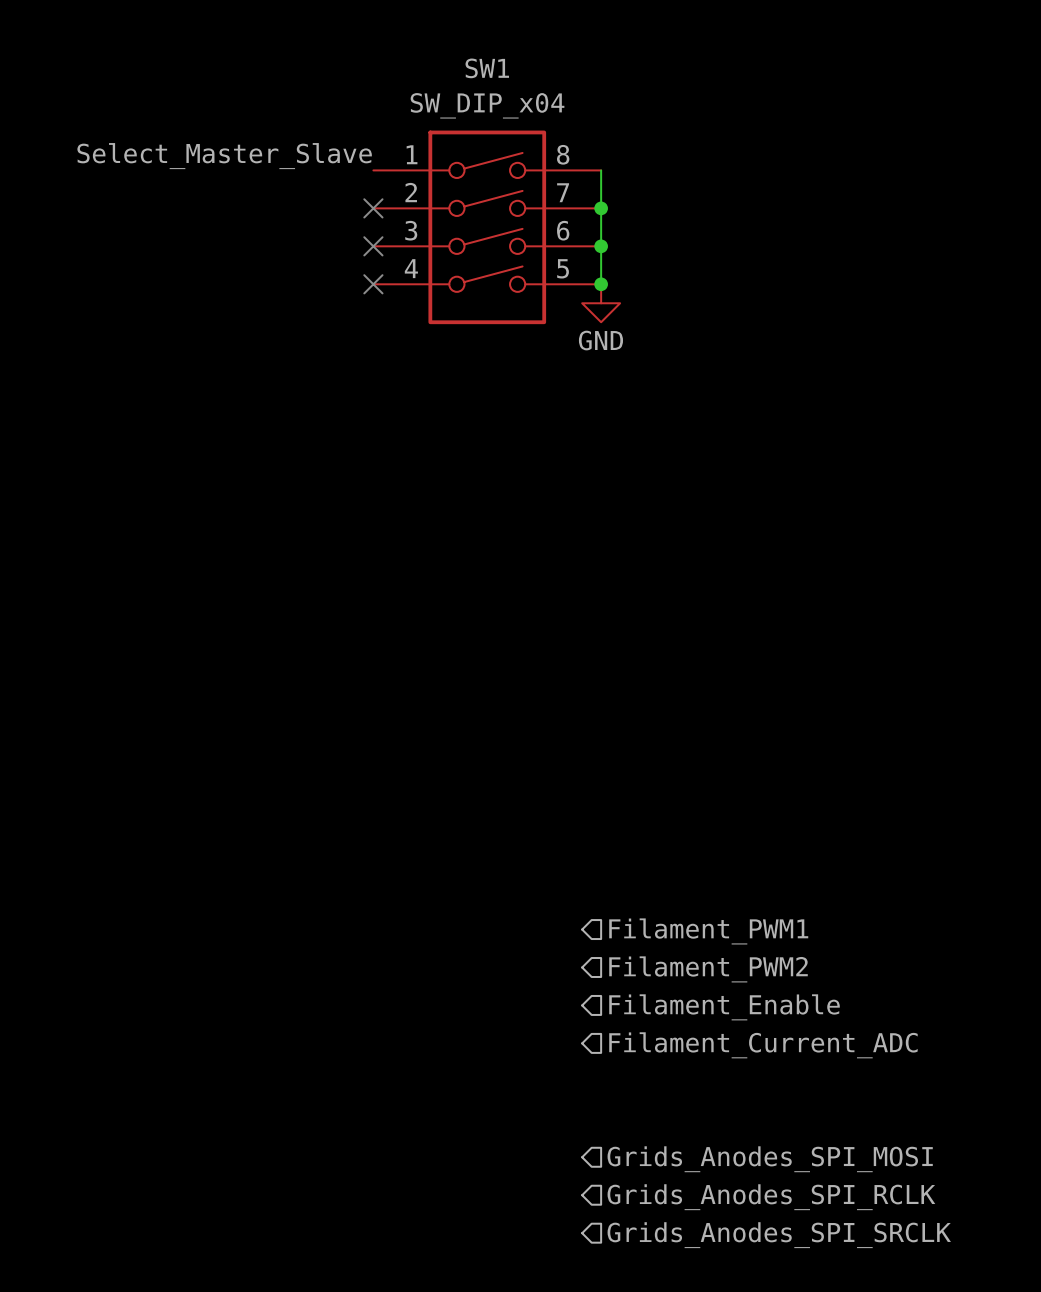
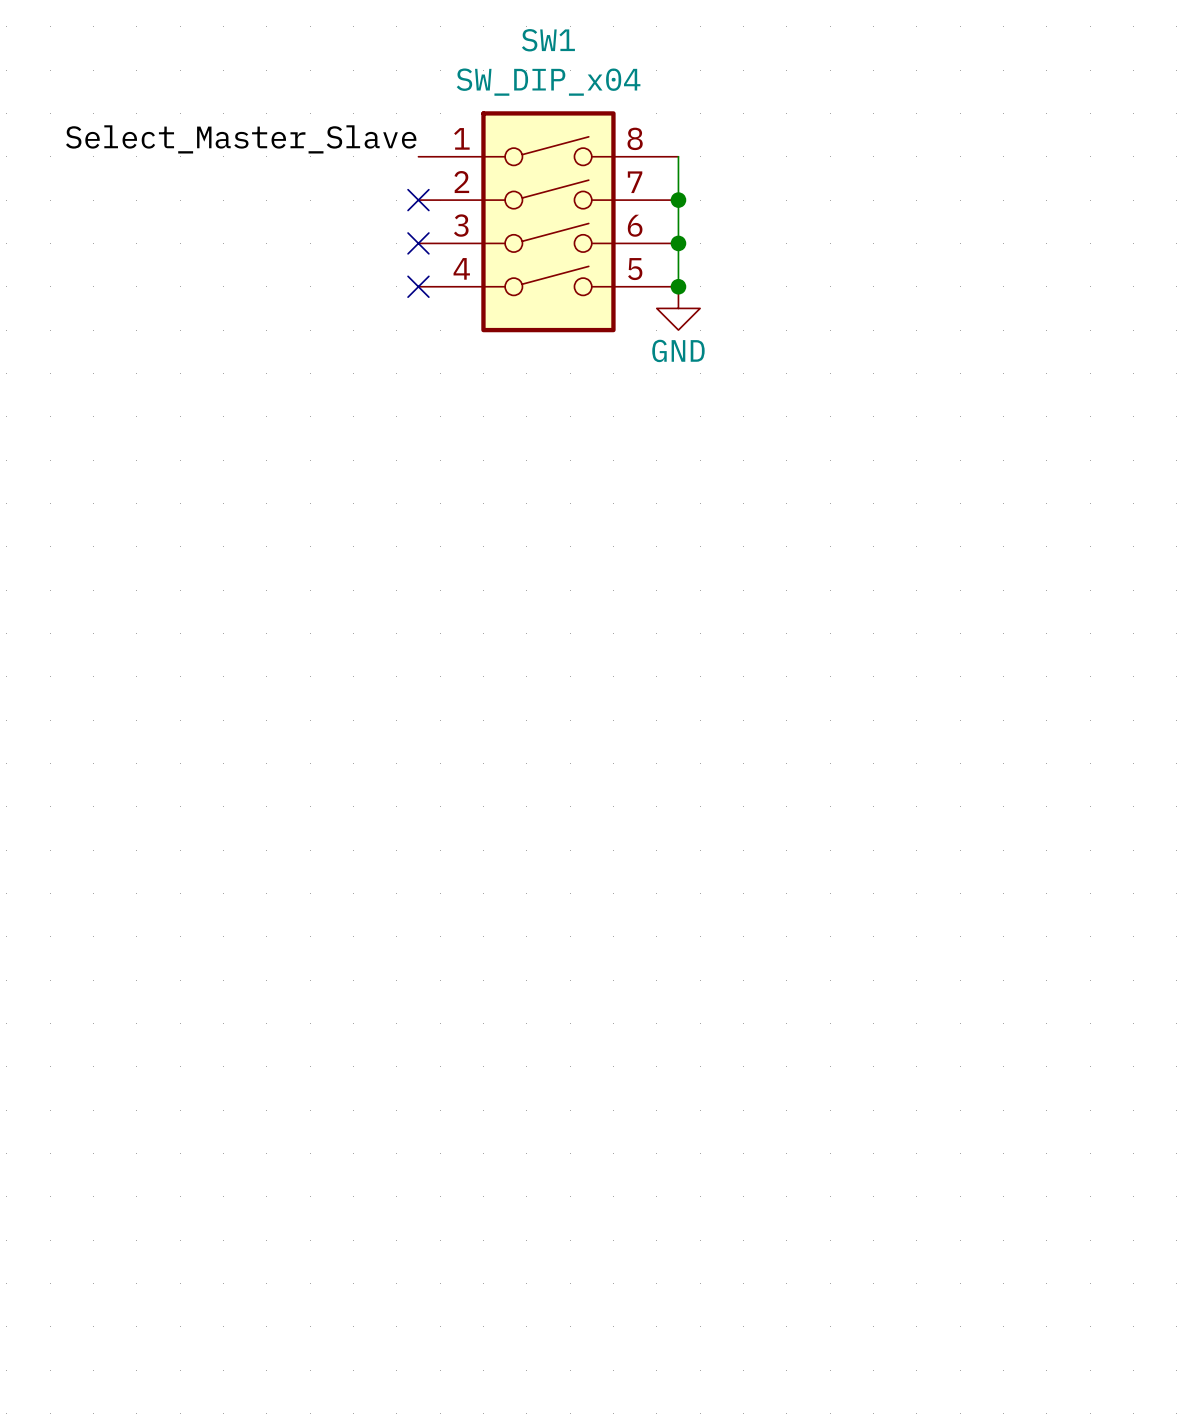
hierarchical label: Filament_PWM1 (708, 931) -> none
hierarchical label: Filament_PWM2 (708, 969) -> none
hierarchical label: Filament_Enable (724, 1007) -> none
hierarchical label: Filament_Current_ADC (763, 1045) -> none
hierarchical label: Grids_Anodes_SPI_MOSI (770, 1159) -> none
hierarchical label: Grids_Anodes_SPI_RCLK (771, 1197) -> none
hierarchical label: Grids_Anodes_SPI_SRCLK (779, 1235) -> none

